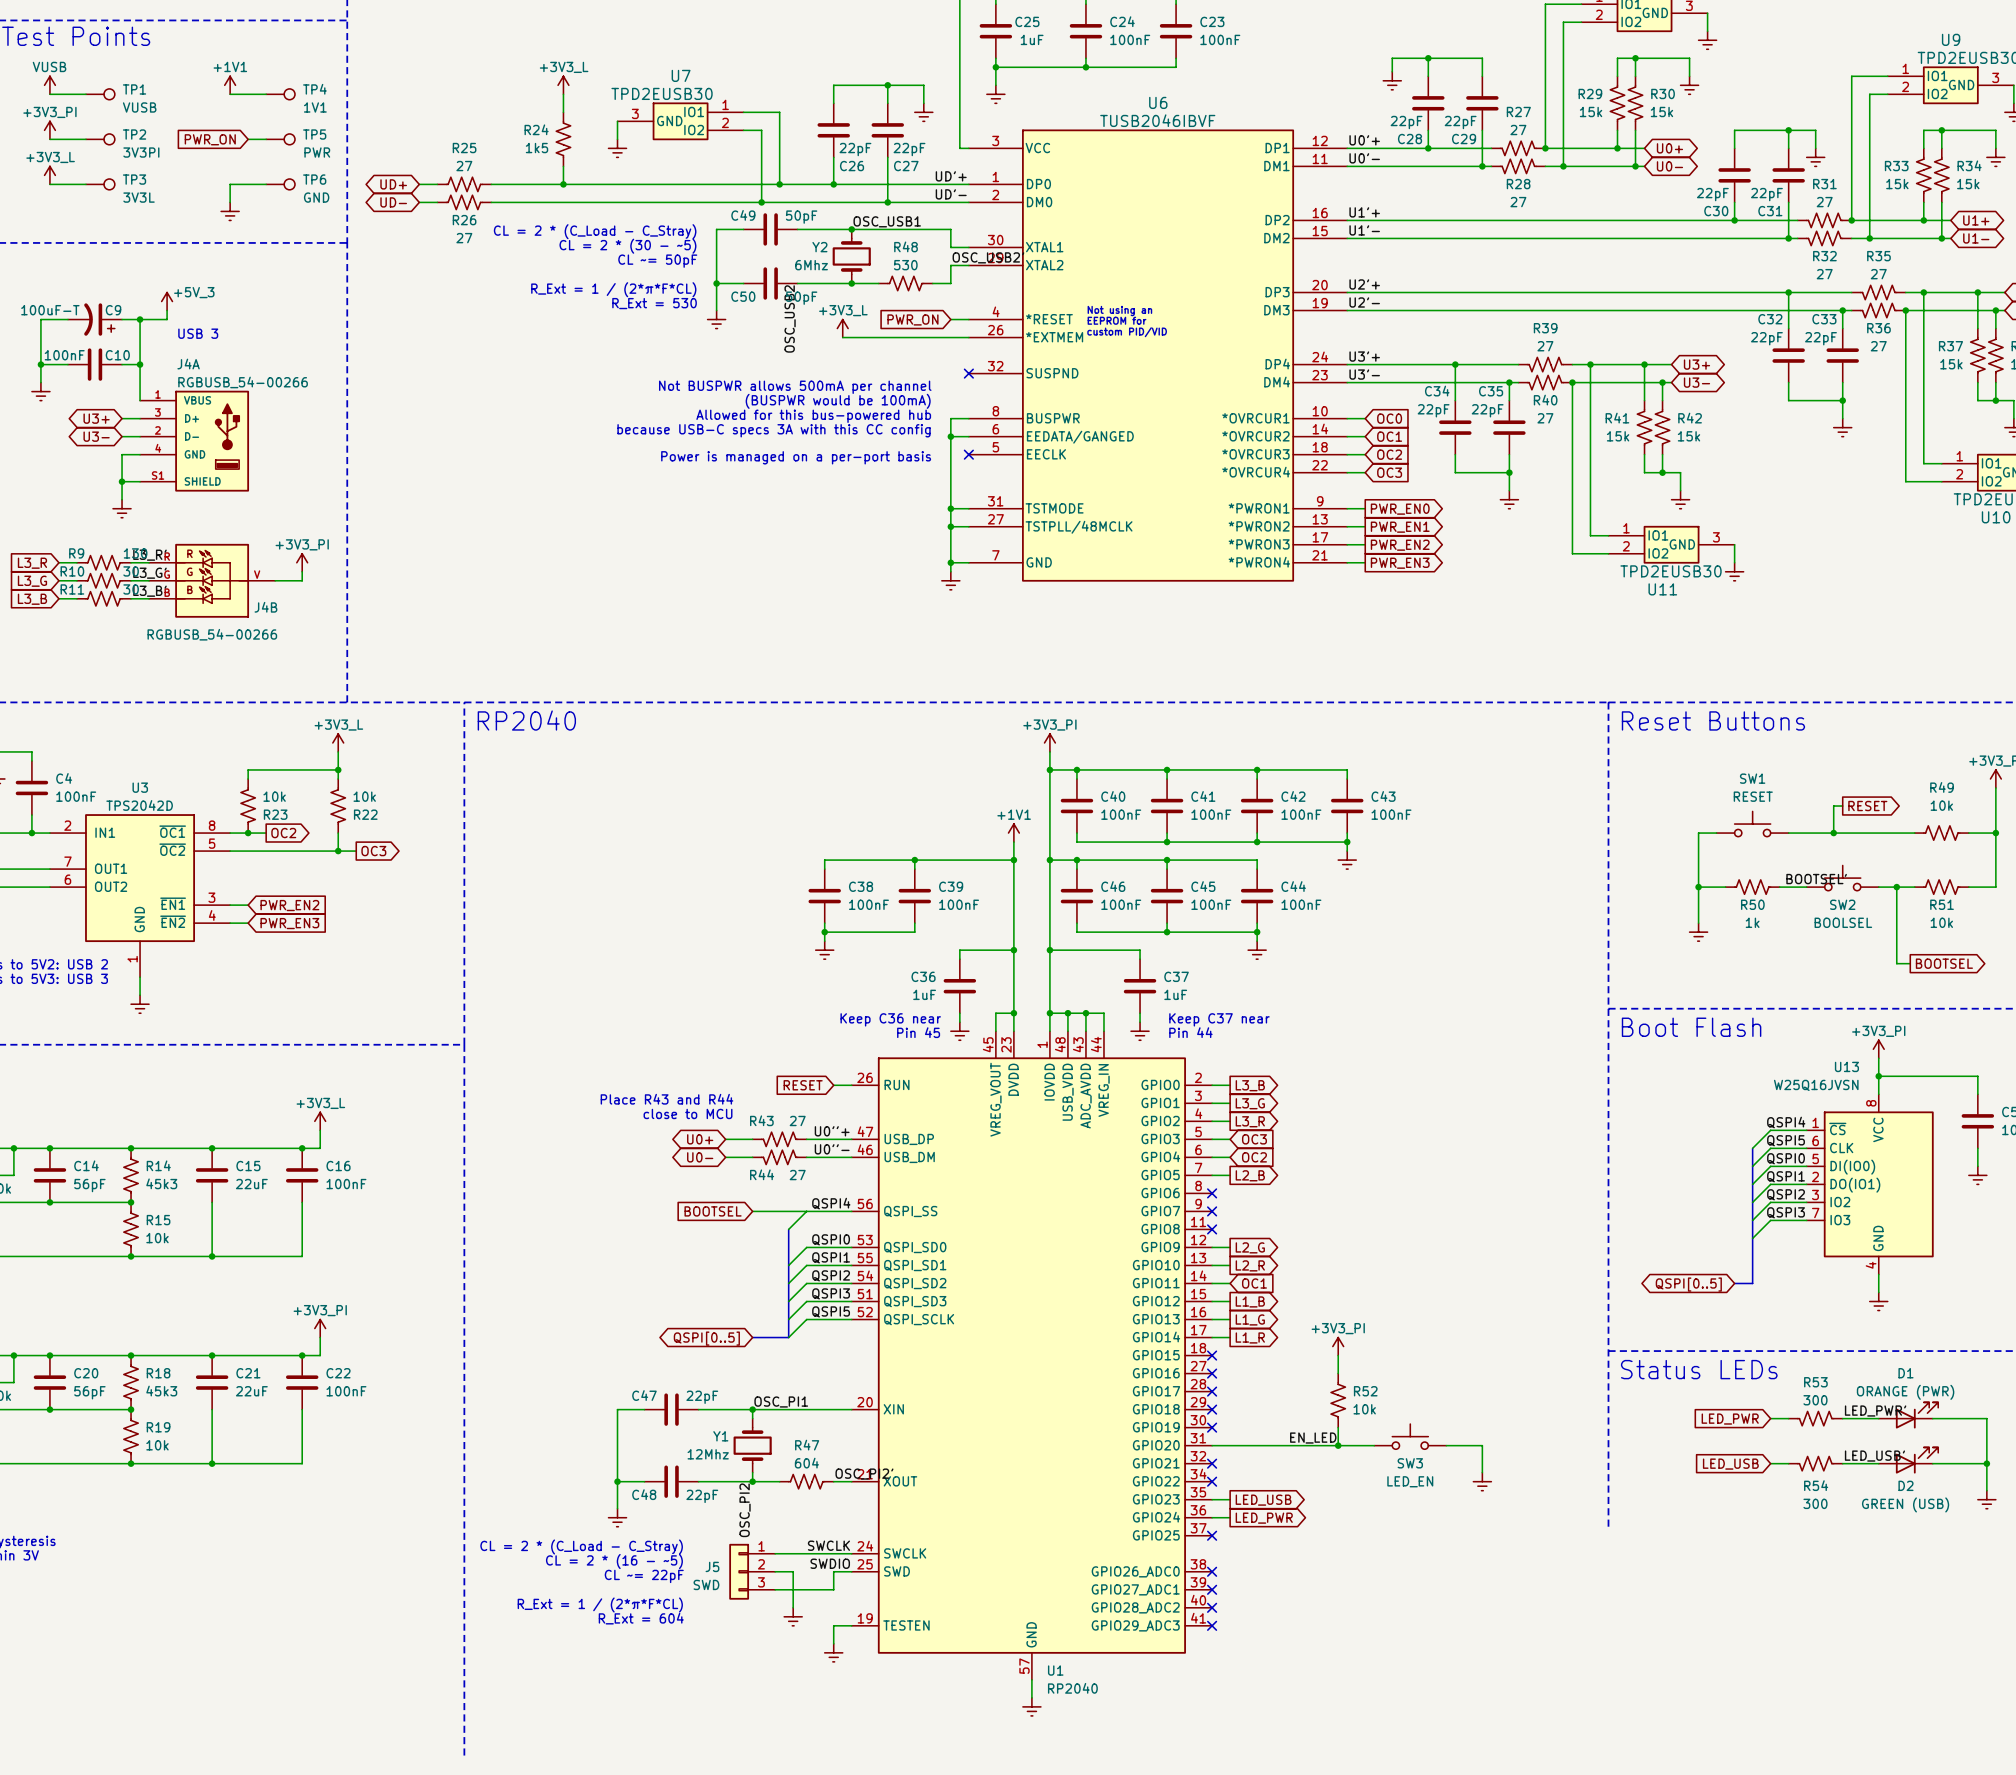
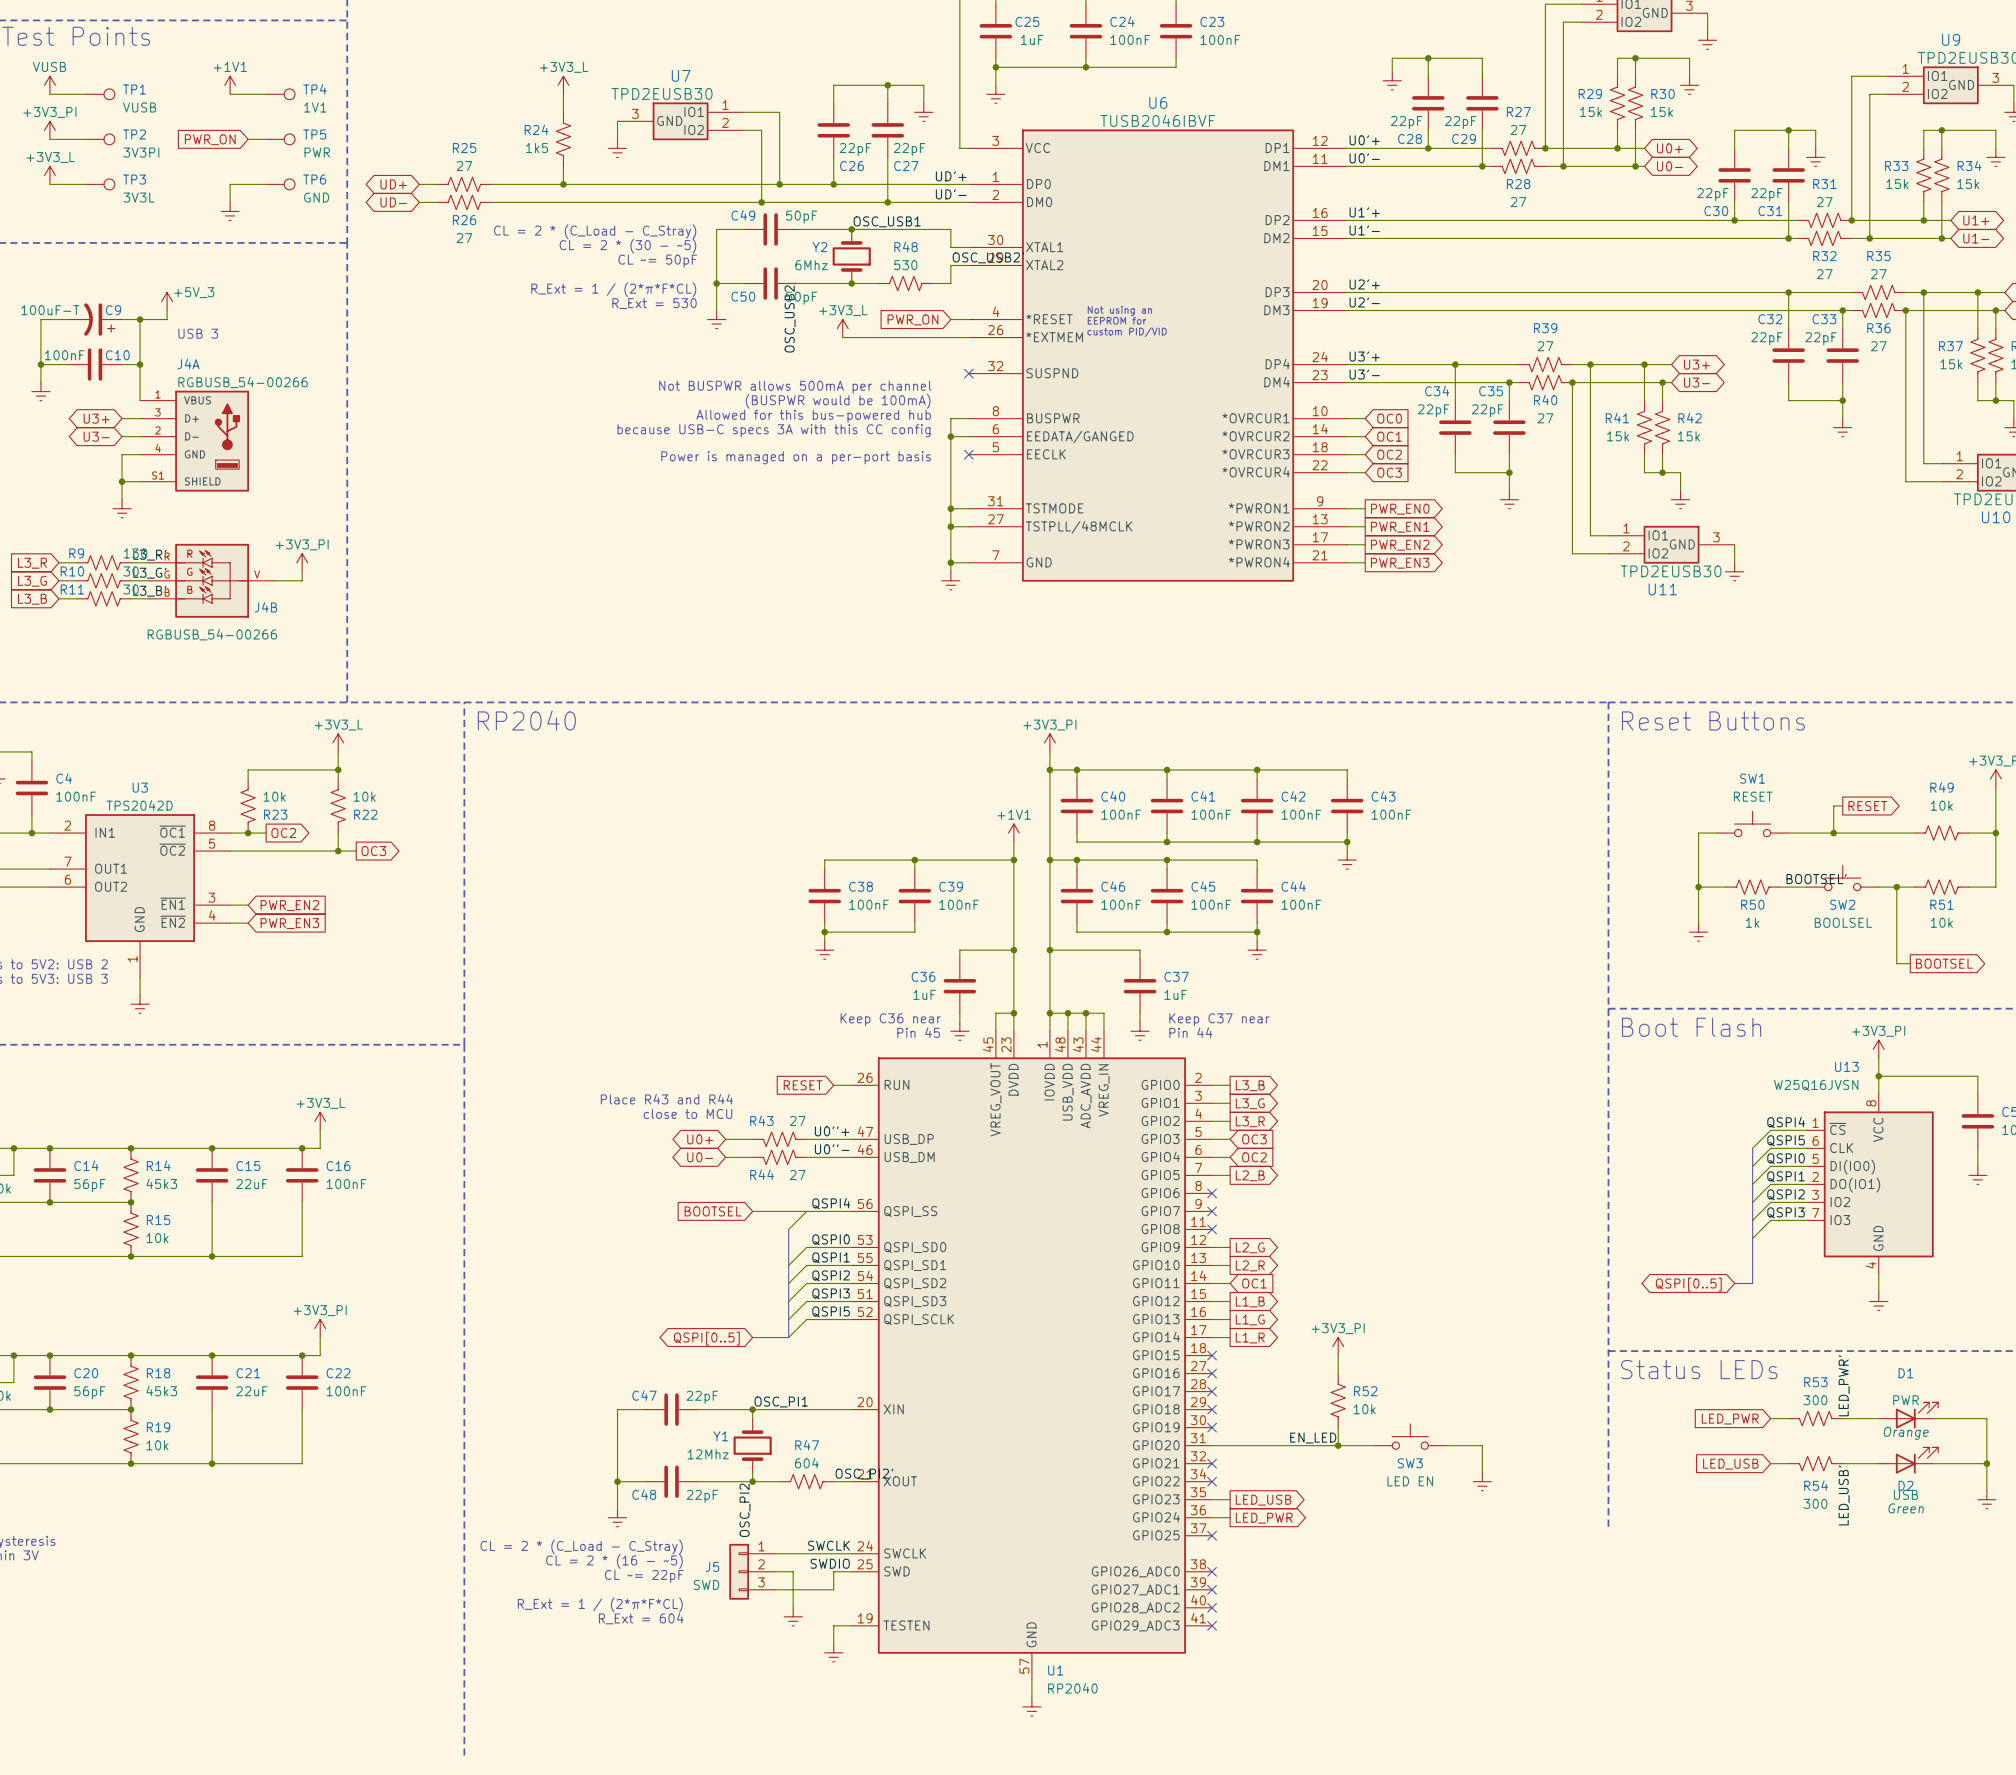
D1 value: ORANGE (PWR) (1905, 1392) -> PWR (1905, 1400)
label rotation: 0° (1875, 1411) -> 90° counterclockwise (1844, 1385)
D1 text: none -> Orange (1906, 1433)
label rotation: 0° (1874, 1456) -> 90° counterclockwise (1844, 1495)
SW3 value: LED_EN (1410, 1481) -> LED EN (1410, 1481)
D2 value: GREEN (USB) (1905, 1504) -> USB (1905, 1494)
D2 text: none -> Green (1906, 1508)

